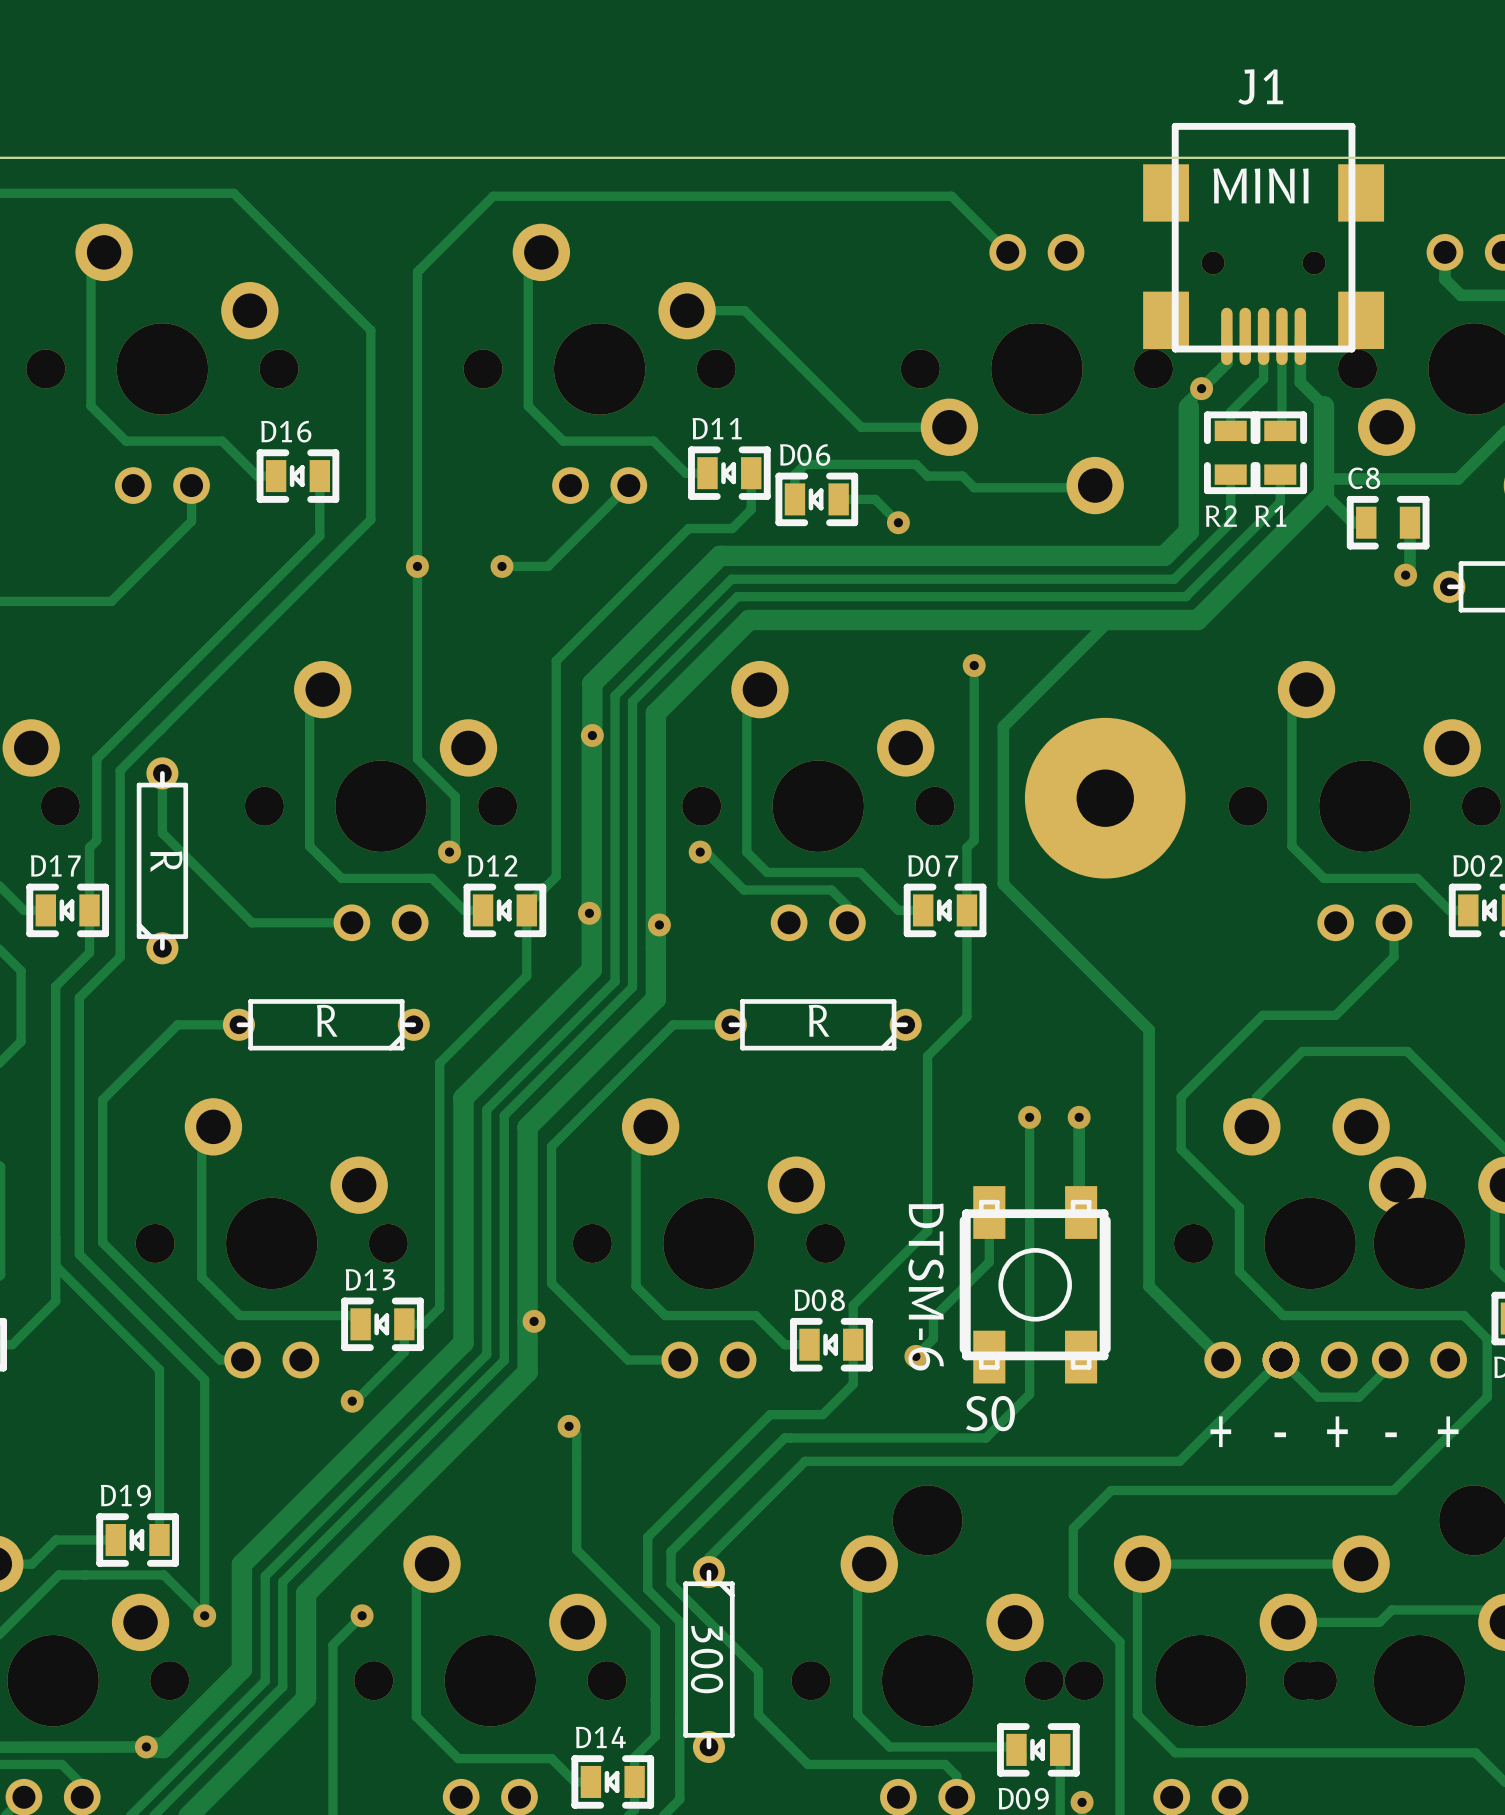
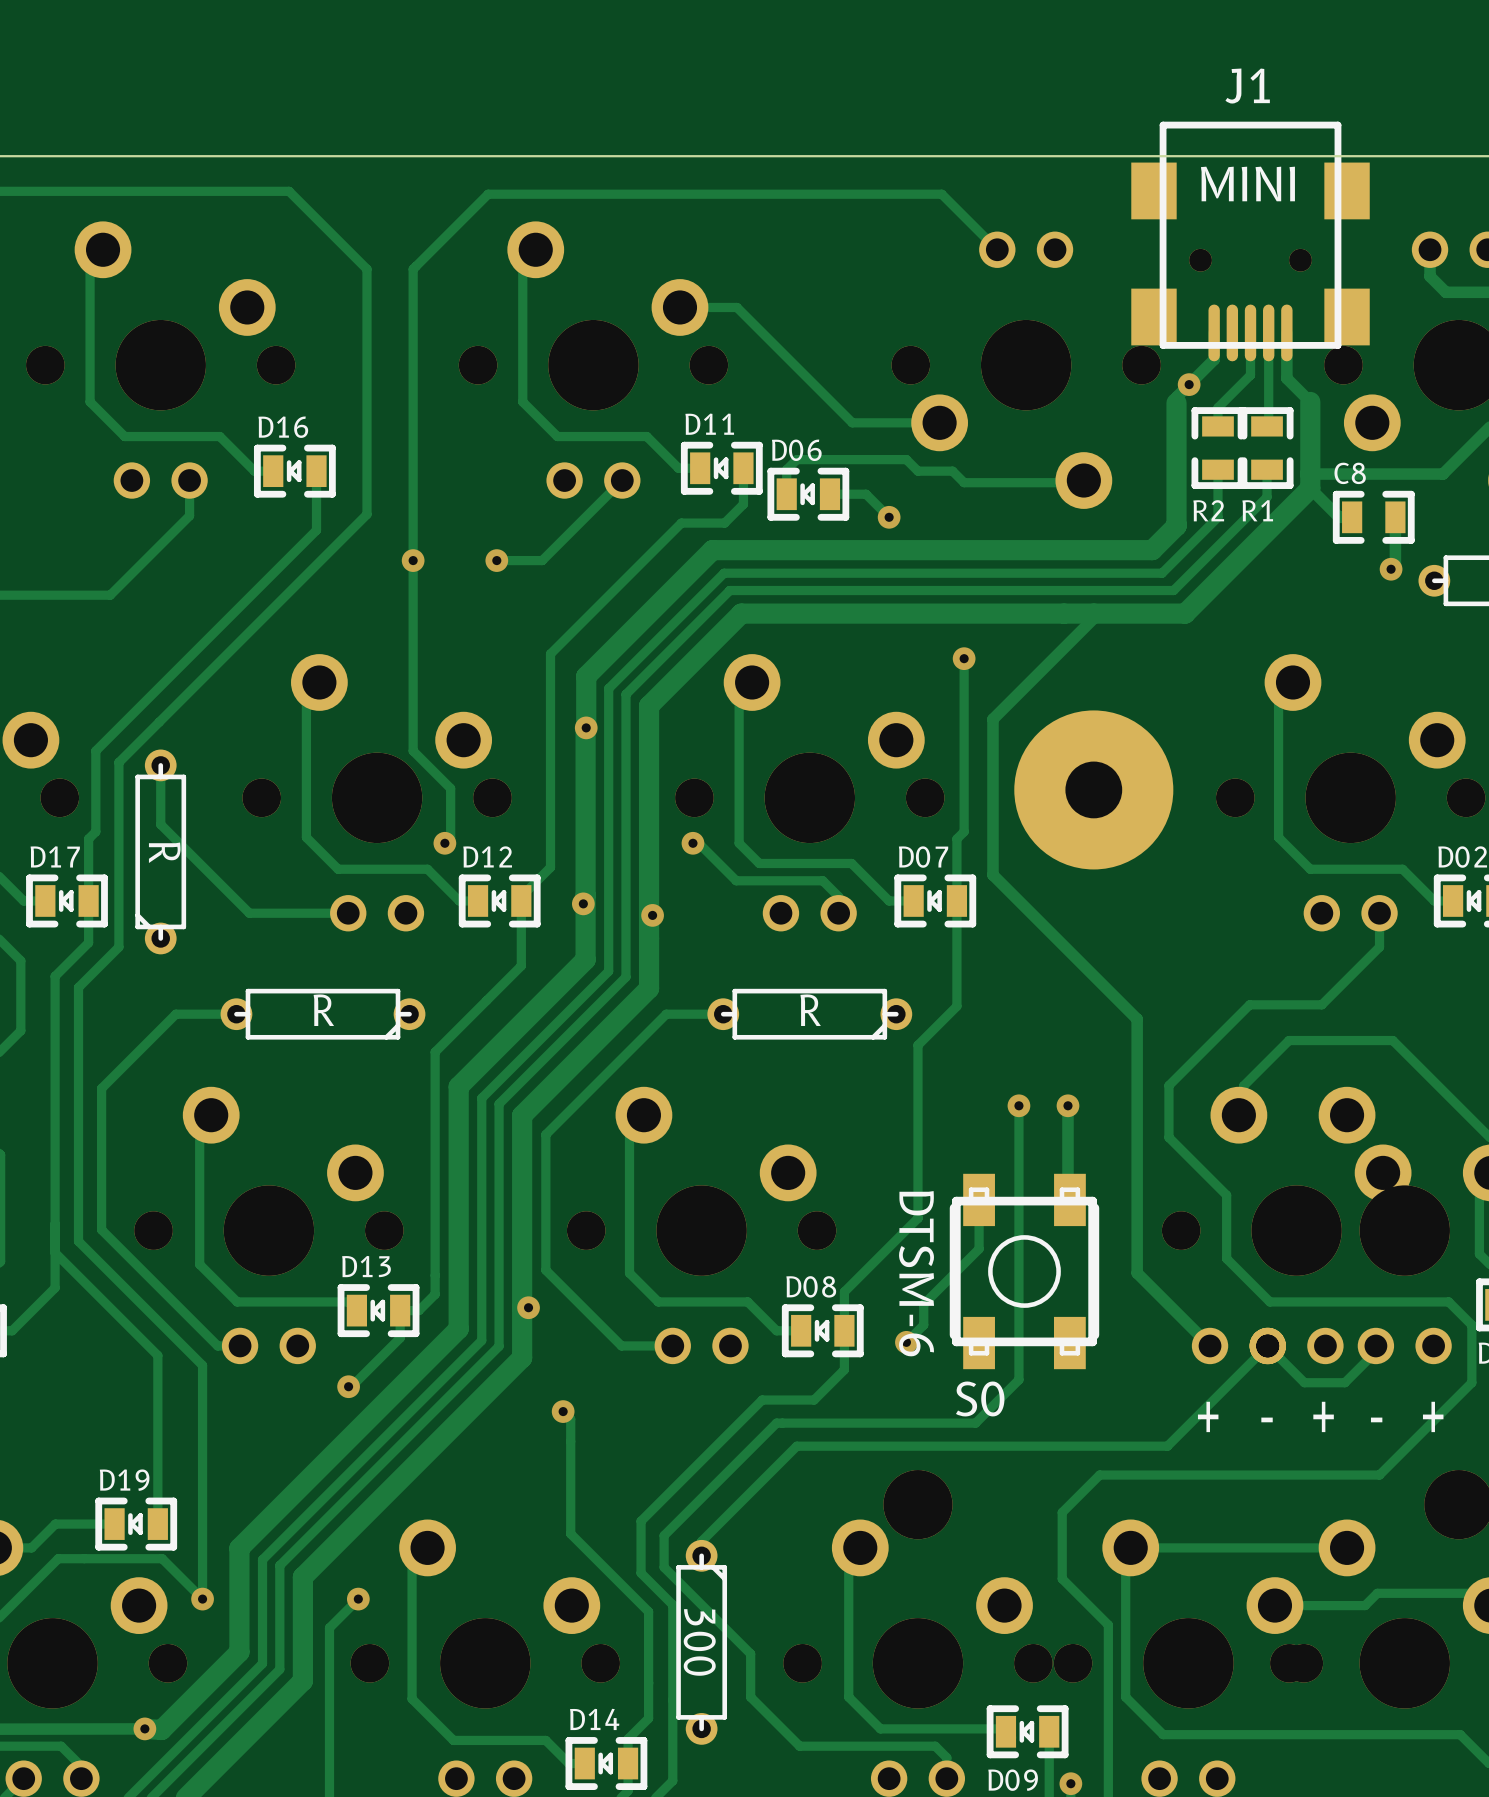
track: (233, 193) (370, 330) -> (231, 191) (289, 191) (366, 269) (366, 326)

